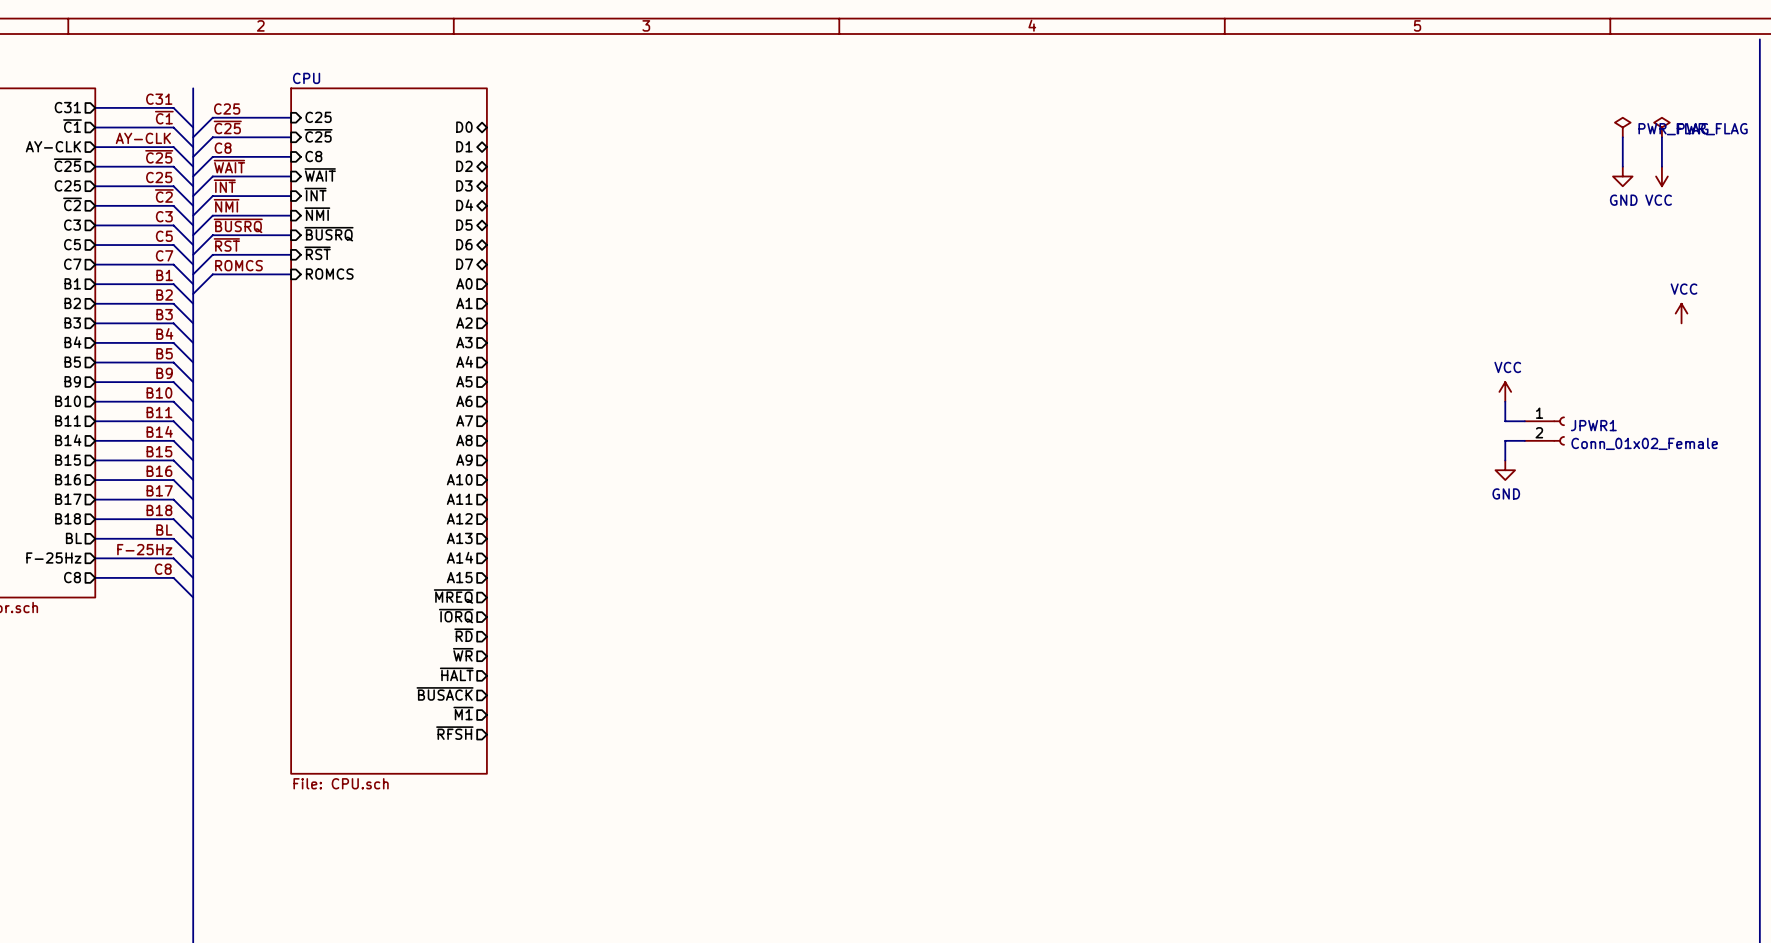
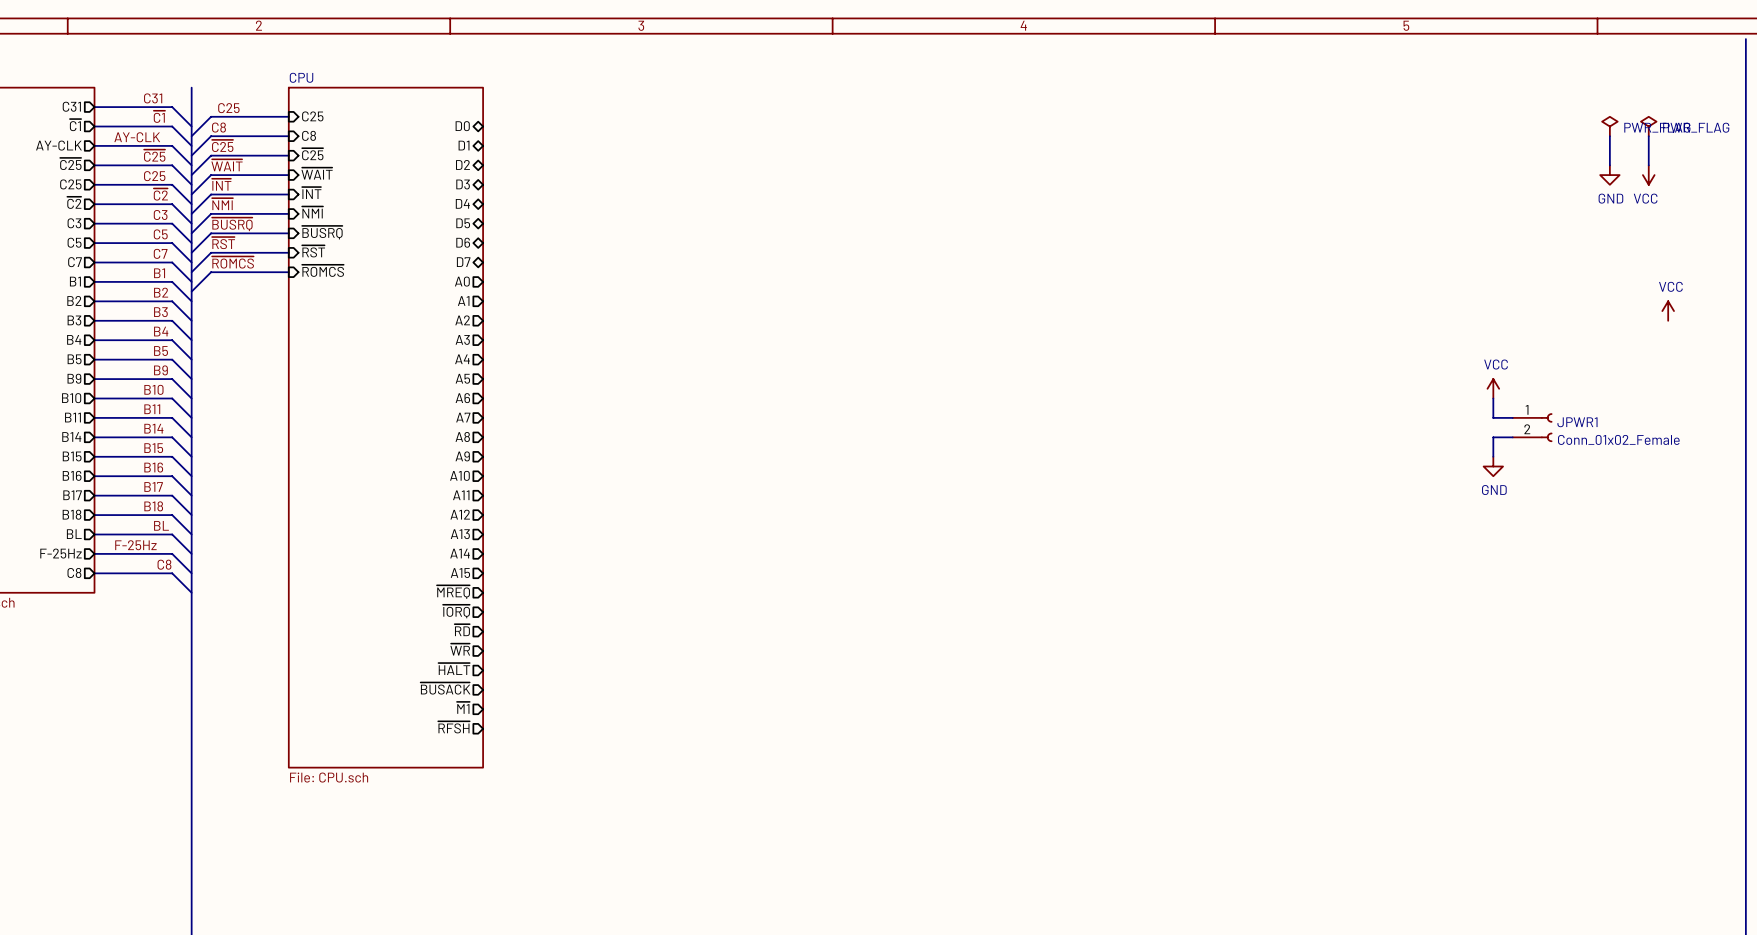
label: ~{C25} (227, 127) -> C8 (218, 127)
sheet pin: ~{C25} (318, 135) -> C8 (309, 135)
label: C8 (223, 148) -> ~{C25} (222, 145)
sheet pin: C8 (313, 156) -> ~{C25} (312, 154)
label: ROMCS (238, 265) -> ~{ROMCS} (232, 262)
sheet pin: ROMCS (329, 274) -> ~{ROMCS} (323, 270)

